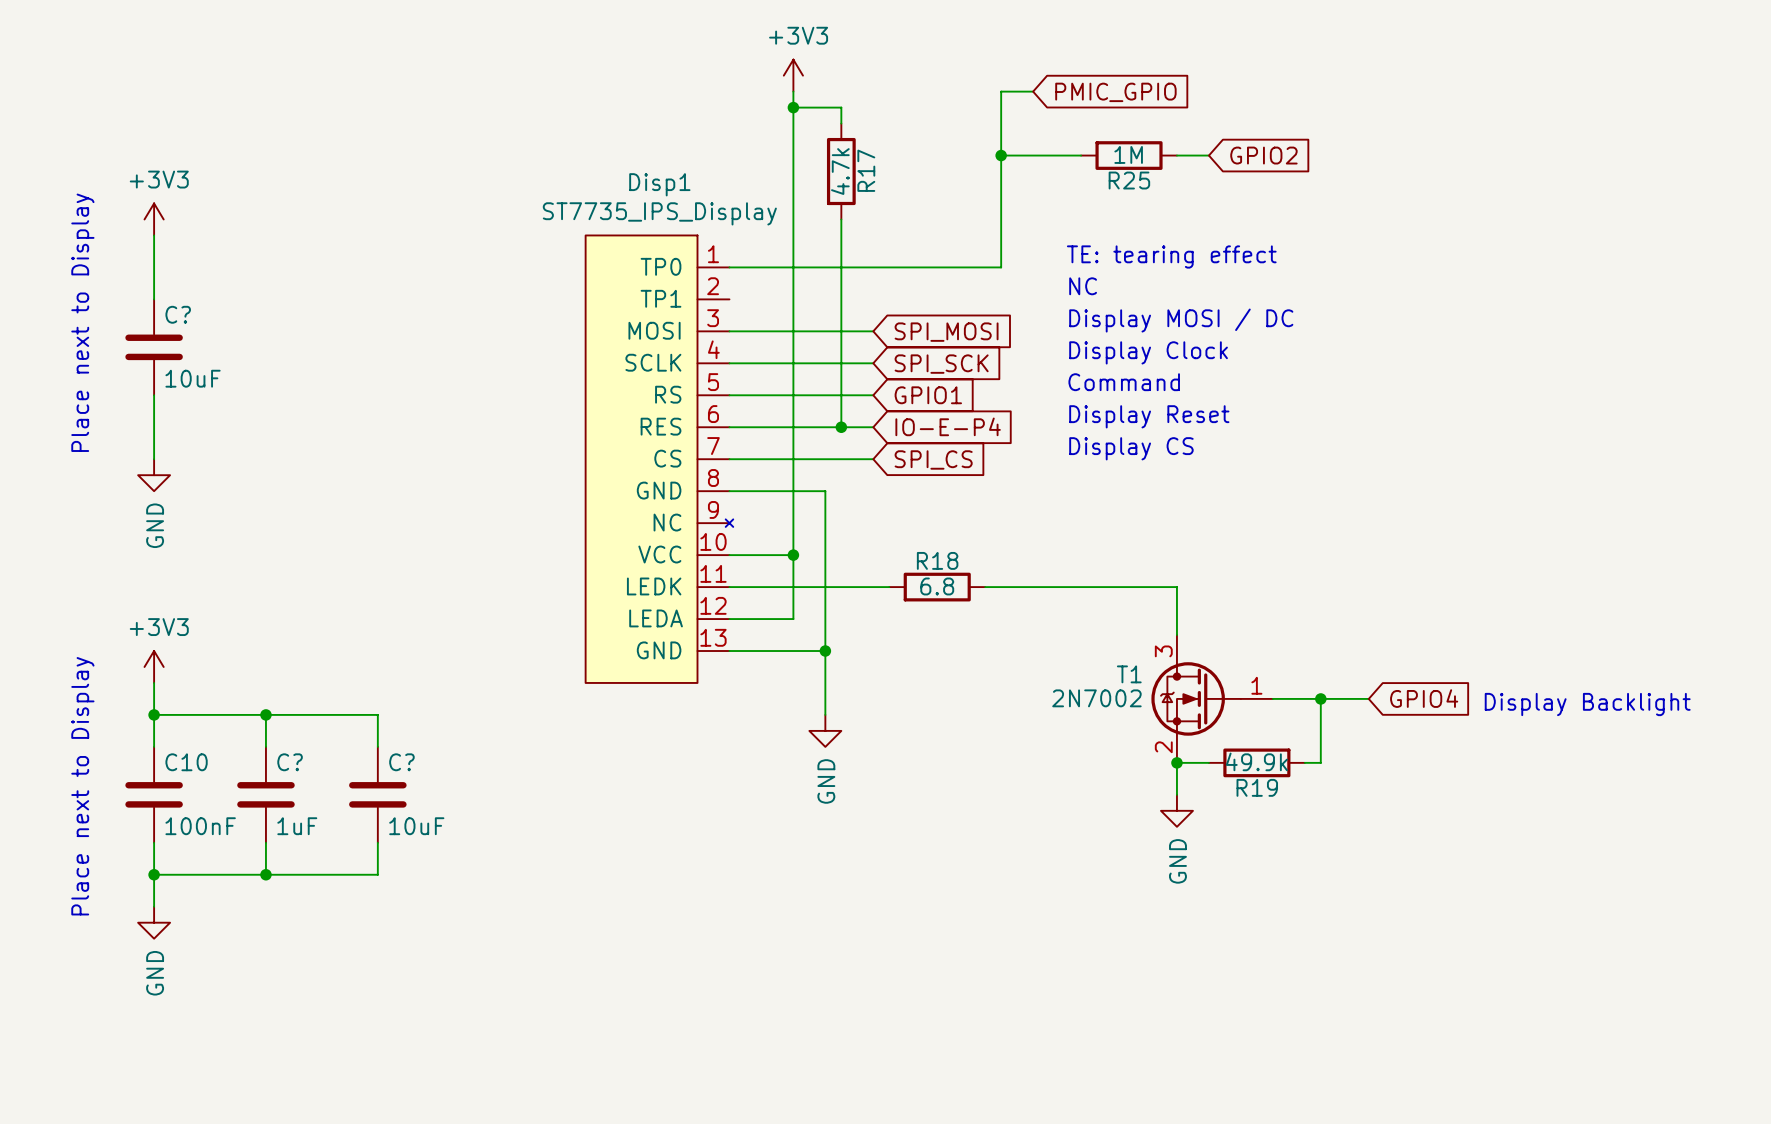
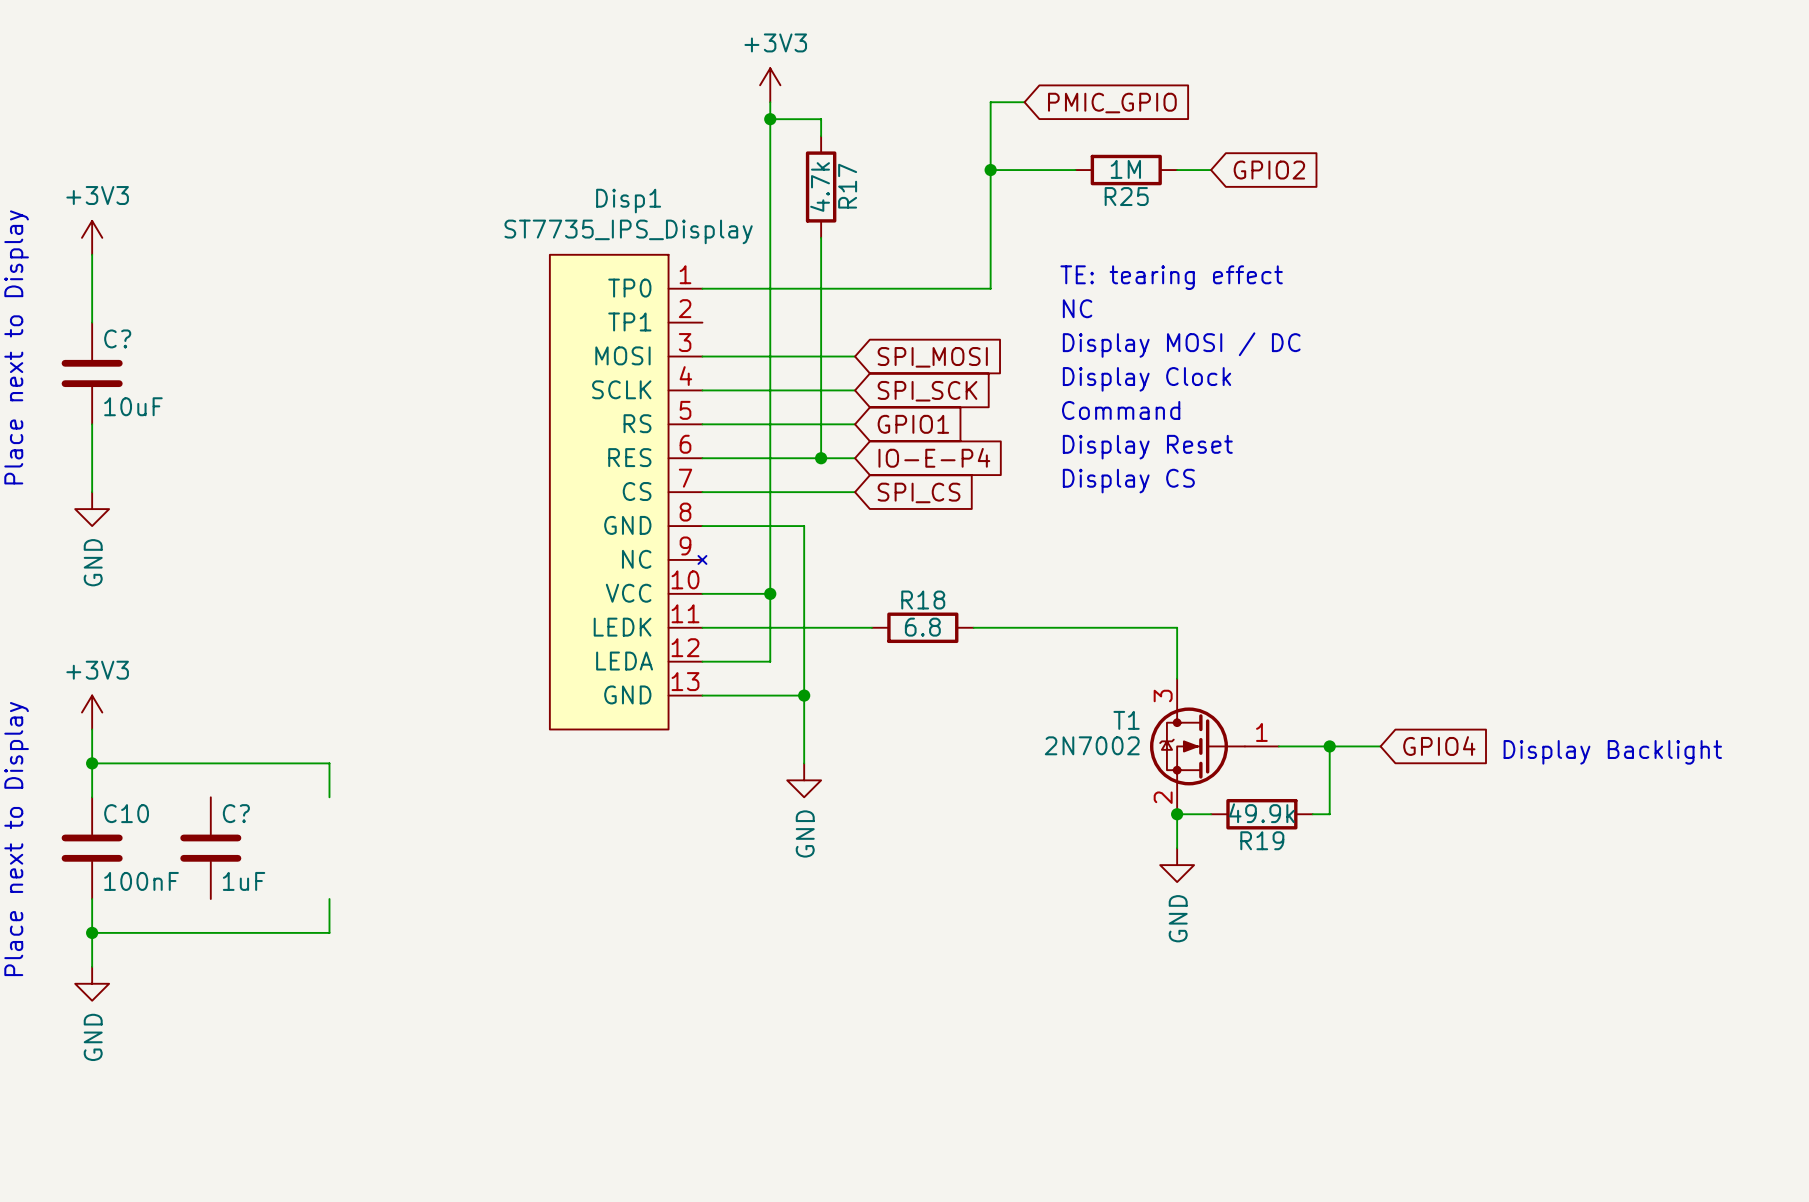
wire: (265, 714) (265, 746) -> none
junction: (265, 714) -> none
C?: 10uF (377, 794) -> none
wire: (265, 842) (265, 874) -> none
junction: (265, 874) -> none

